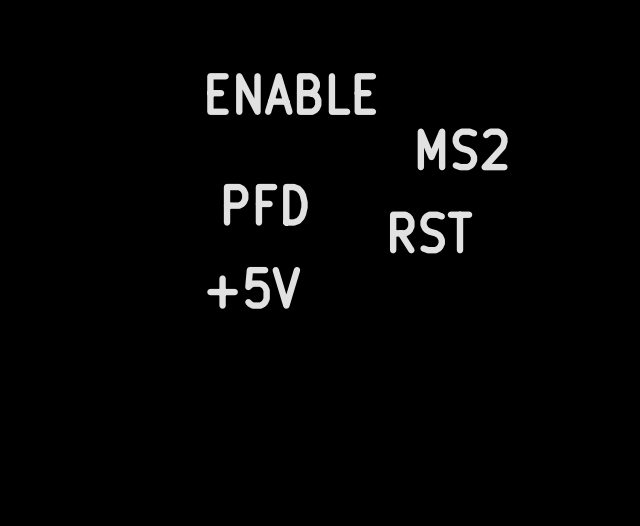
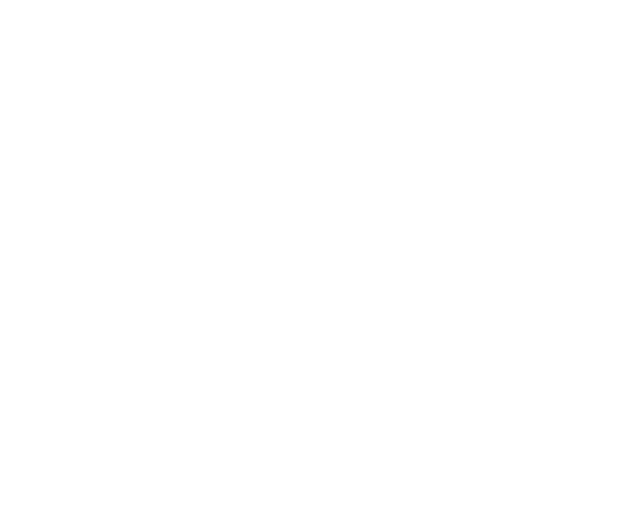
text: ENABLE (291, 94) -> none
text: MS2 (462, 149) -> none
text: PFD (265, 204) -> none
text: RST (431, 232) -> none
text: +5V (253, 287) -> none

